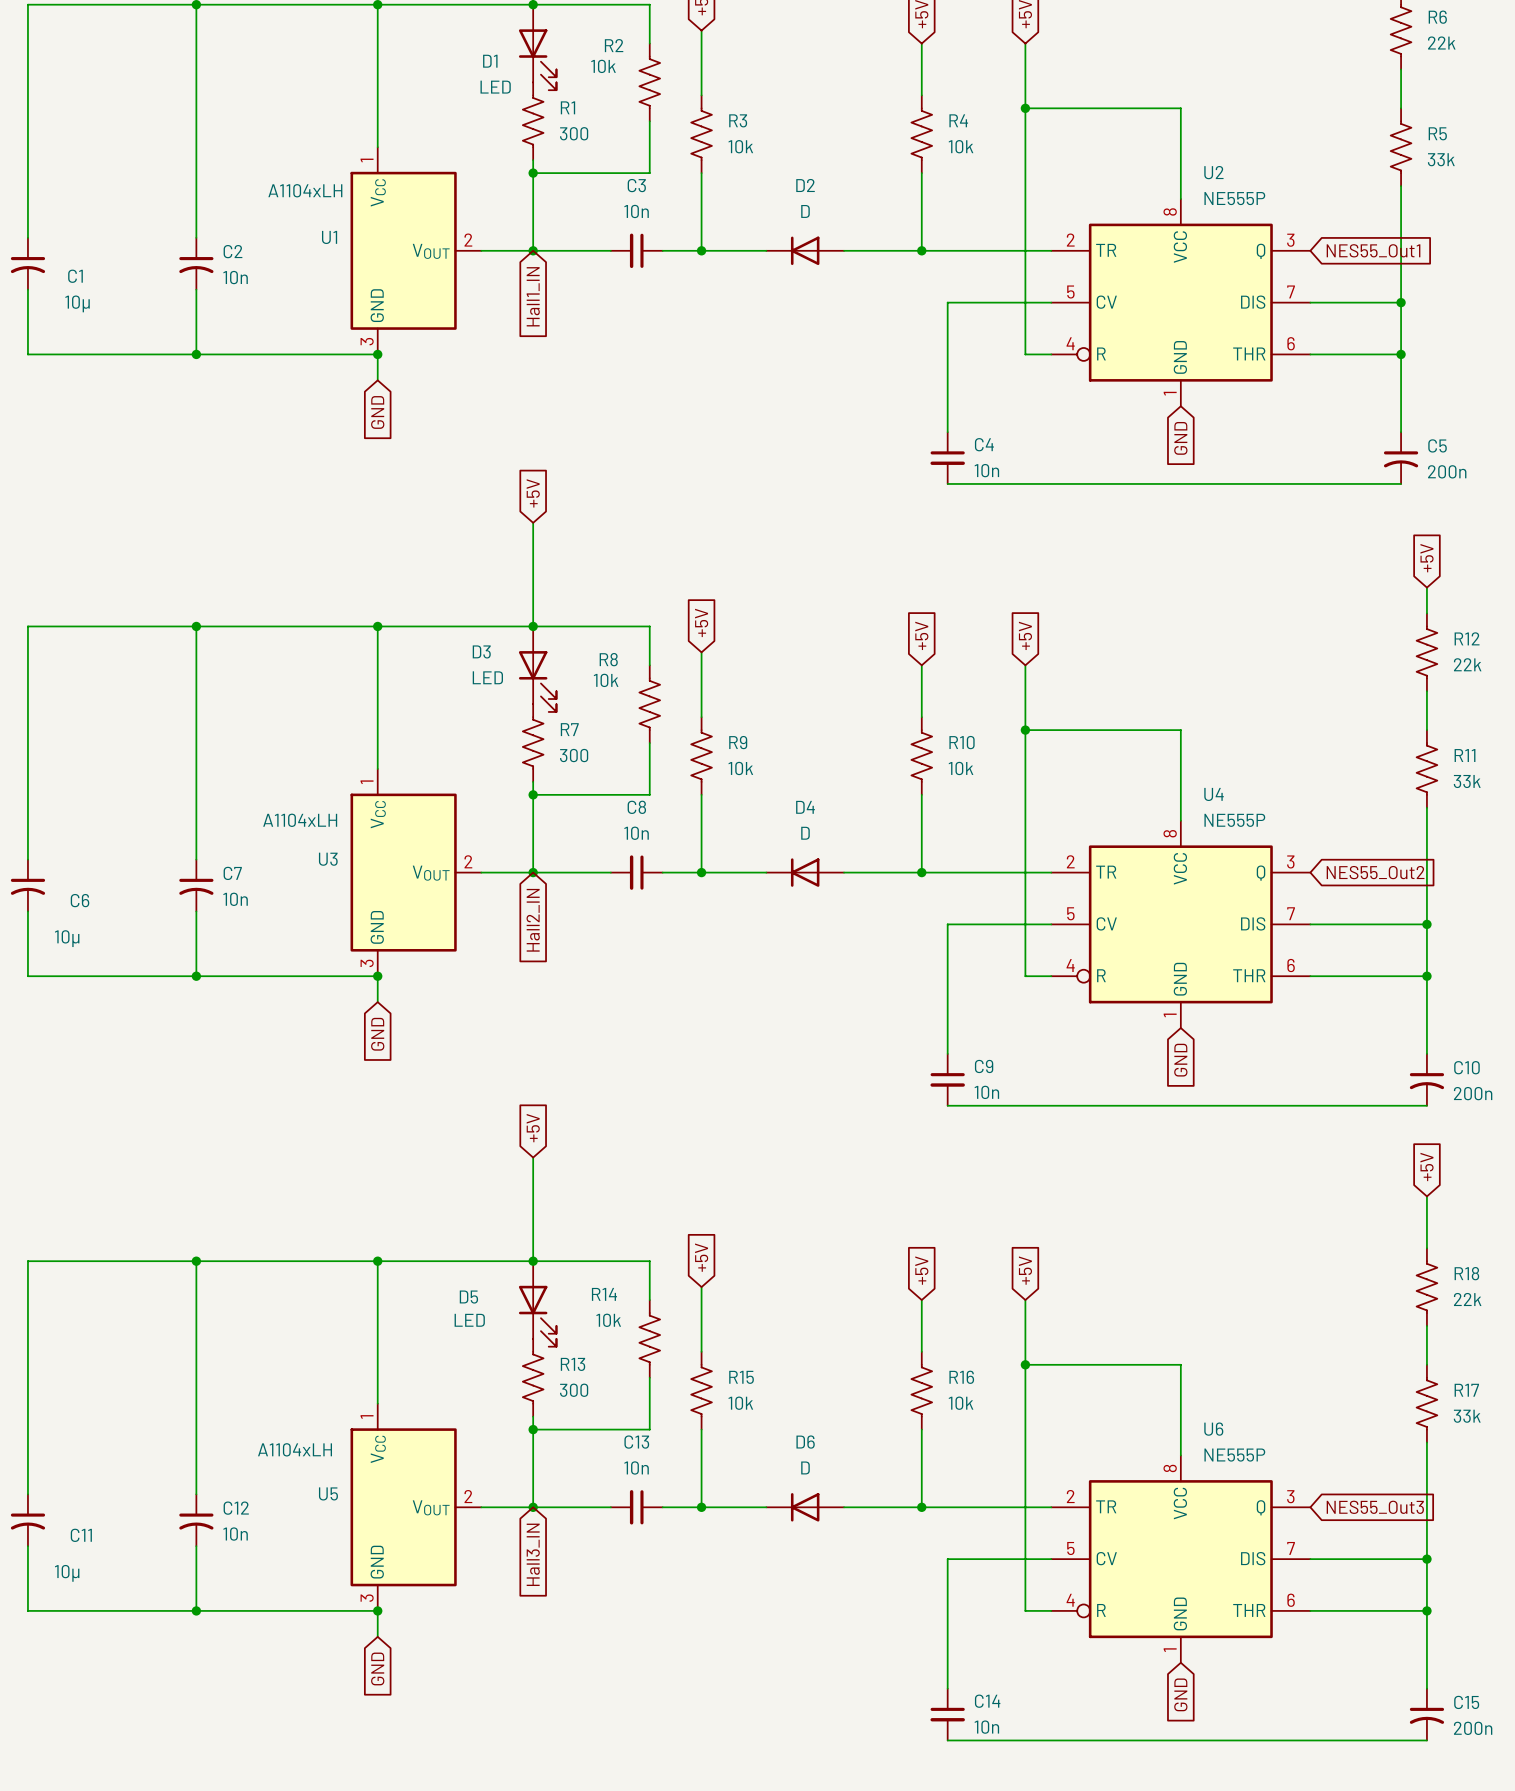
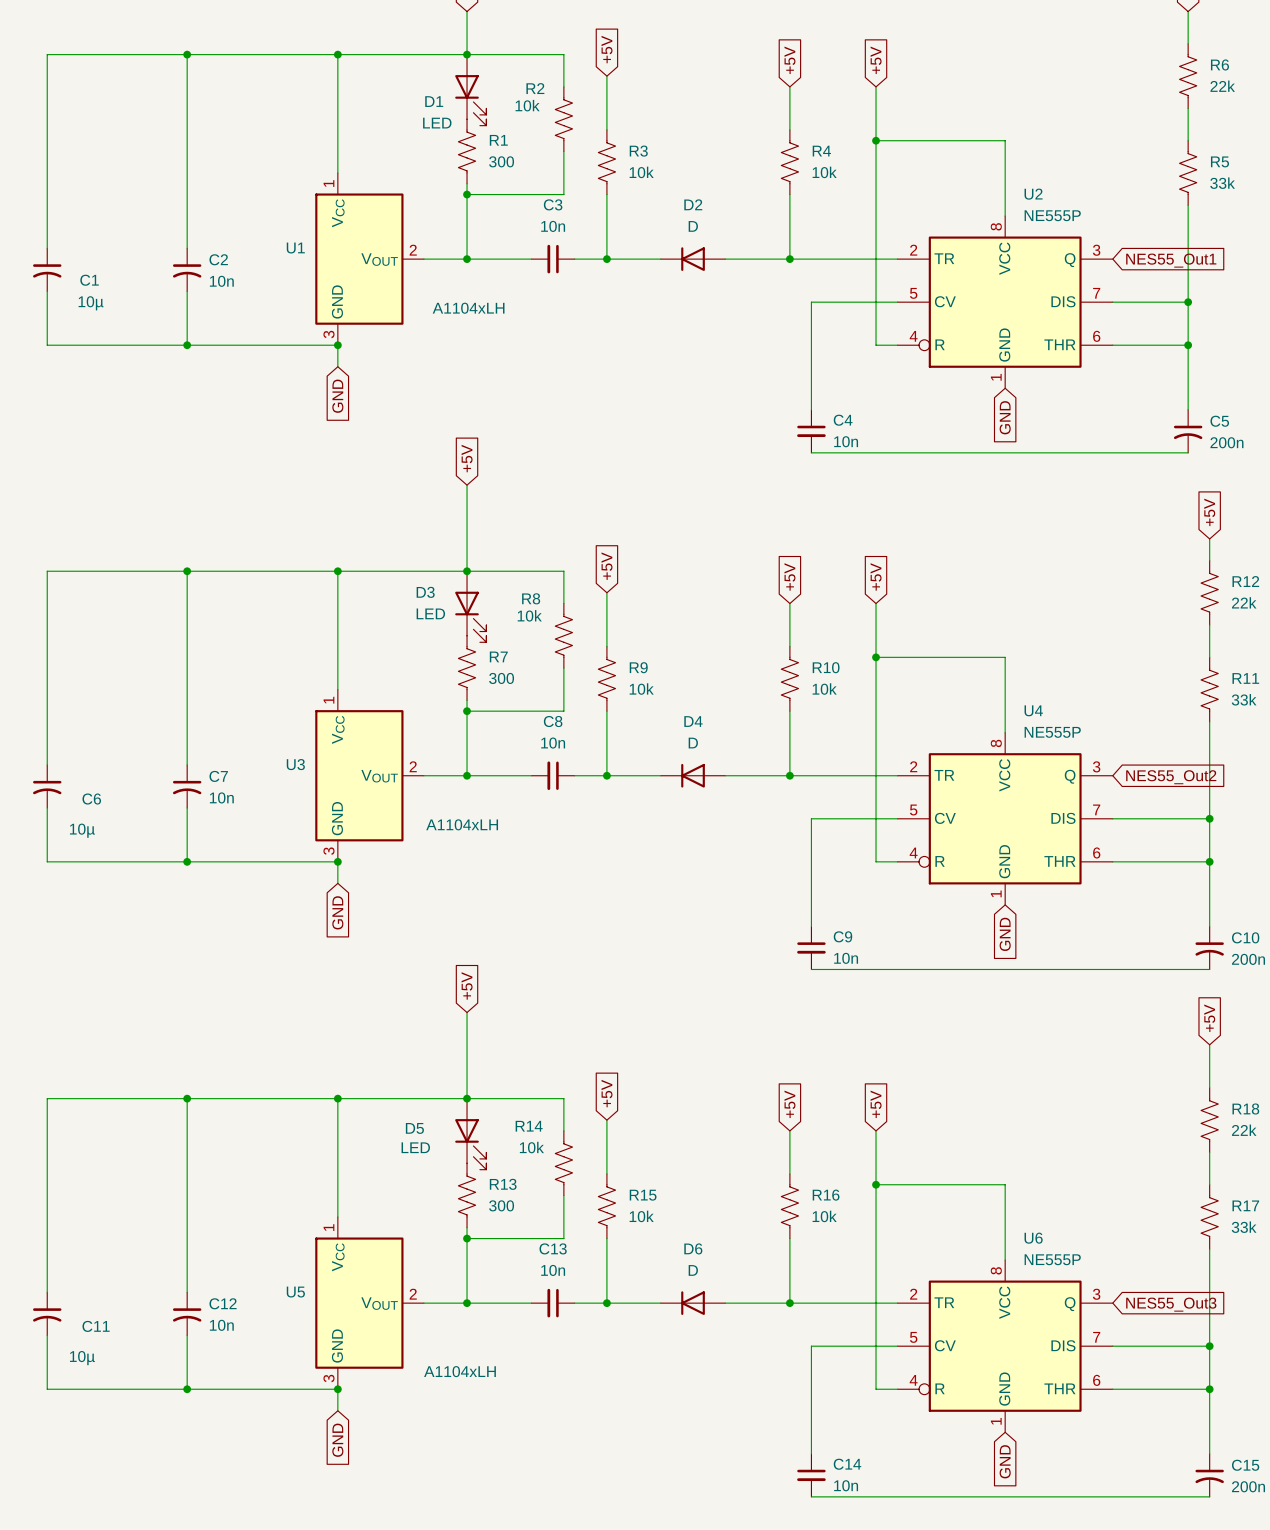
U1 value position: A1104xLH (305, 190) -> A1104xLH (468, 308)
global label: Hall1_IN (533, 296) -> none
U3 value position: A1104xLH (300, 820) -> A1104xLH (462, 824)
global label: Hall2_IN (533, 920) -> none
U5 value position: A1104xLH (295, 1449) -> A1104xLH (460, 1371)
global label: Hall3_IN (533, 1554) -> none

